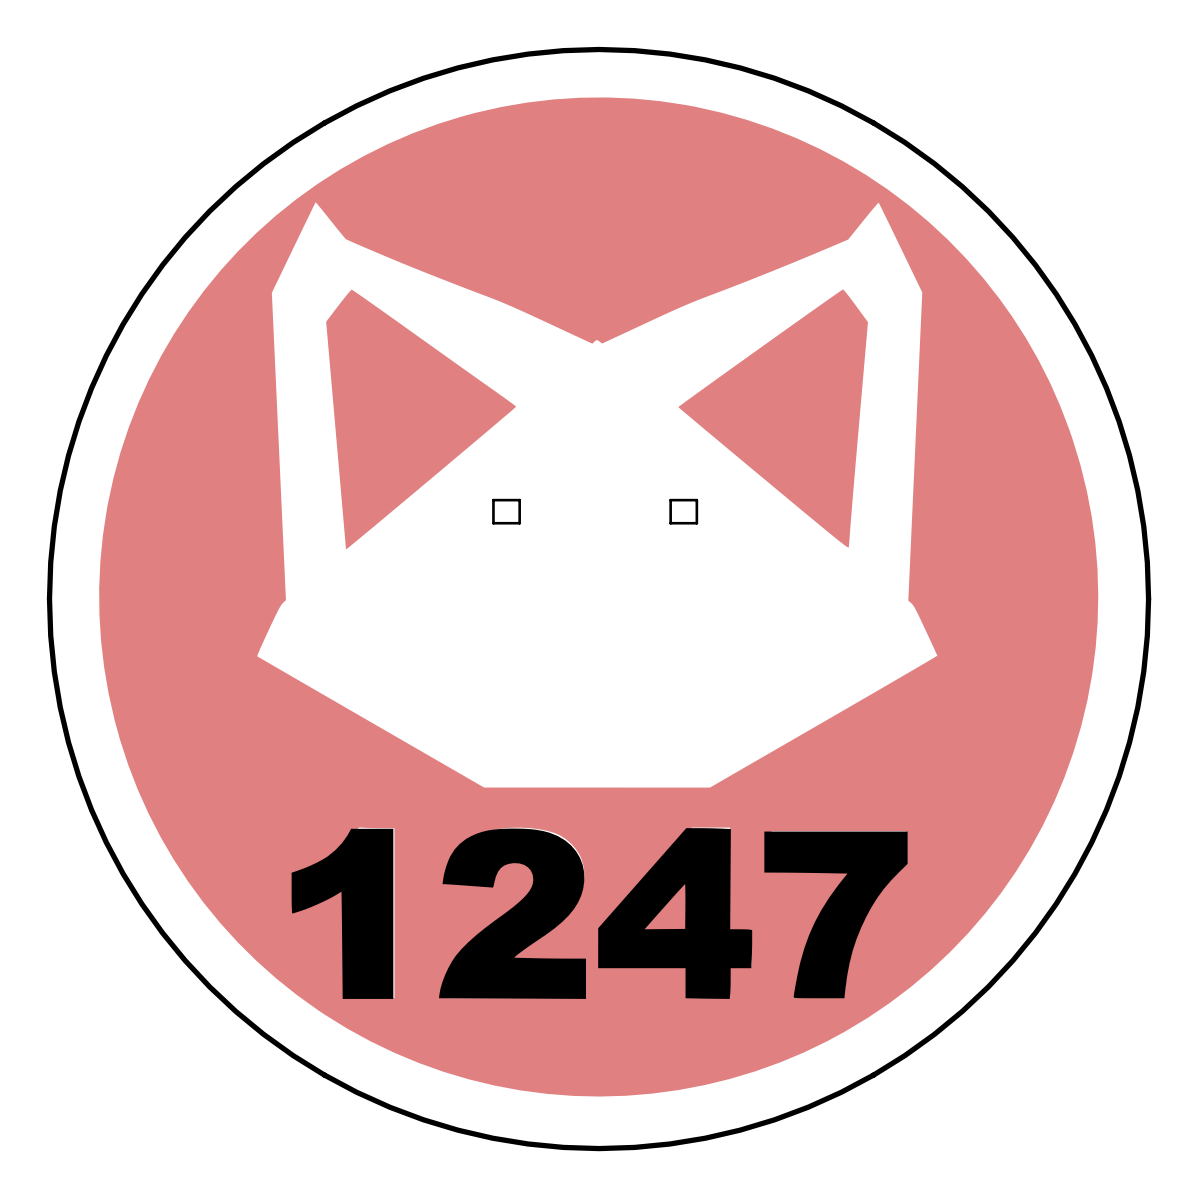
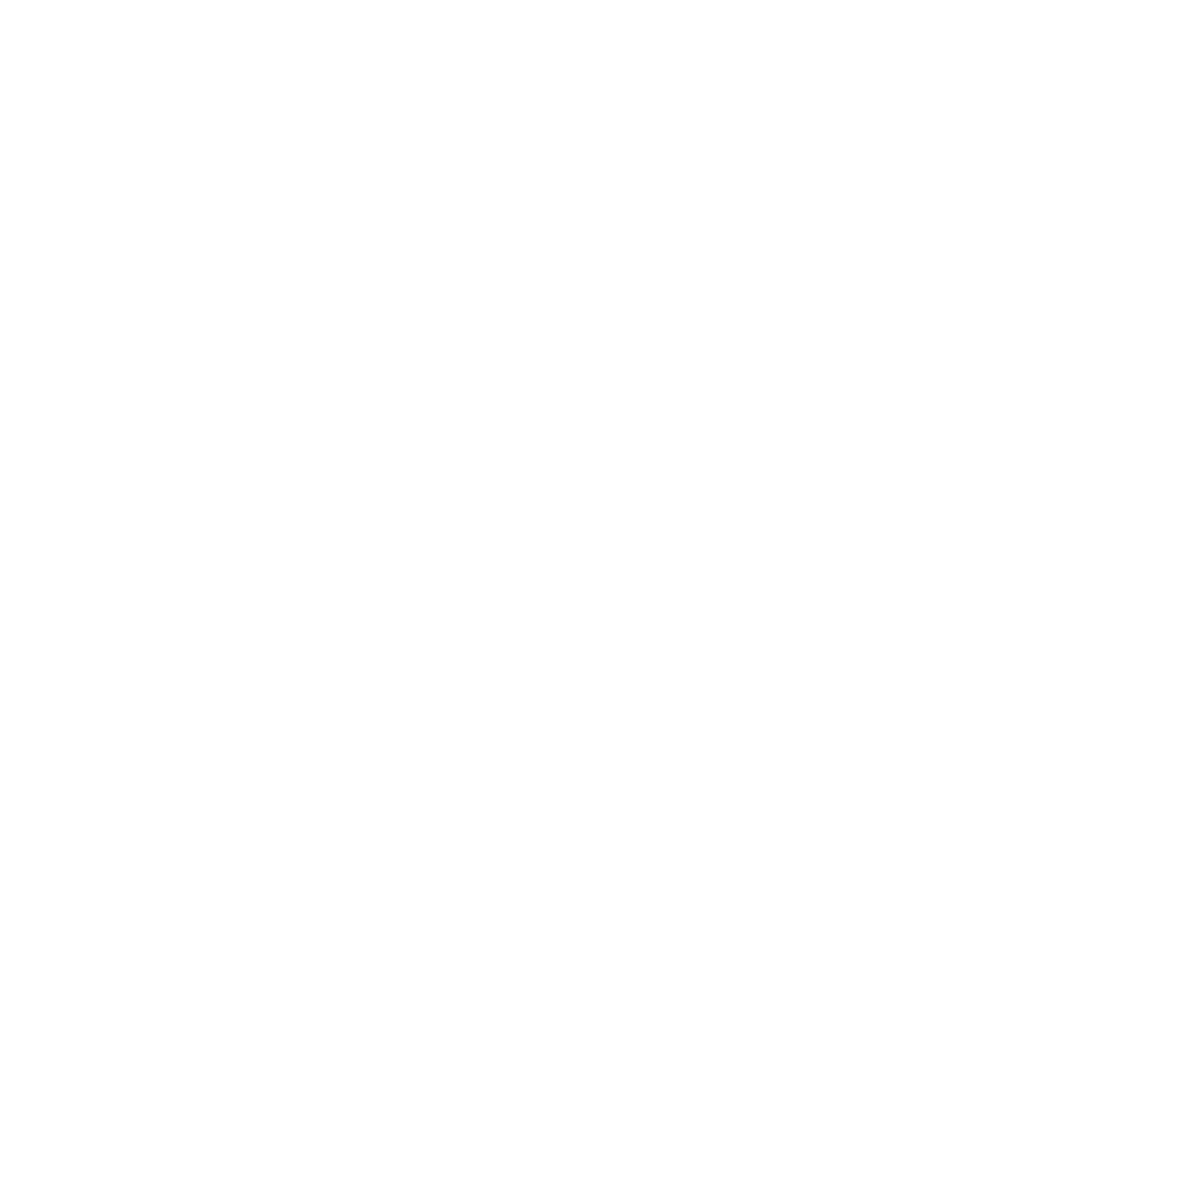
drawing: [99, 97, 1099, 1097] -> none
board edge: (324, 123) (293, 142) (235, 186) (209, 211) (162, 265) (141, 294) (106, 355) (78, 421) (68, 455) (54, 526) (50, 562) (49, 599) (54, 671) (60, 707) (78, 776) (91, 810) (123, 873) (162, 933) (185, 960) (235, 1011) (263, 1034) (324, 1074) (356, 1092) (389, 1107) (457, 1130) (492, 1138) (563, 1147) (634, 1147) (670, 1143) (740, 1130) (774, 1119) (841, 1092) (873, 1074) (904, 1055) (962, 1011) (988, 986) (1035, 933) (1056, 904) (1091, 842) (1119, 776) (1129, 742) (1143, 671) (1147, 635) (1148, 599) (1143, 526) (1137, 490) (1119, 421) (1106, 388) (1074, 324) (1035, 265) (1012, 237) (962, 186) (934, 163) (873, 123) (841, 105) (808, 90) (740, 67) (705, 59) (634, 50) (563, 50) (528, 54) (457, 67) (423, 78) (356, 105) (324, 123) -> none
board edge: (493, 500) (519, 500) (519, 523) (493, 523) (493, 500) -> none
board edge: (670, 500) (696, 500) (696, 523) (670, 523) (670, 500) -> none

